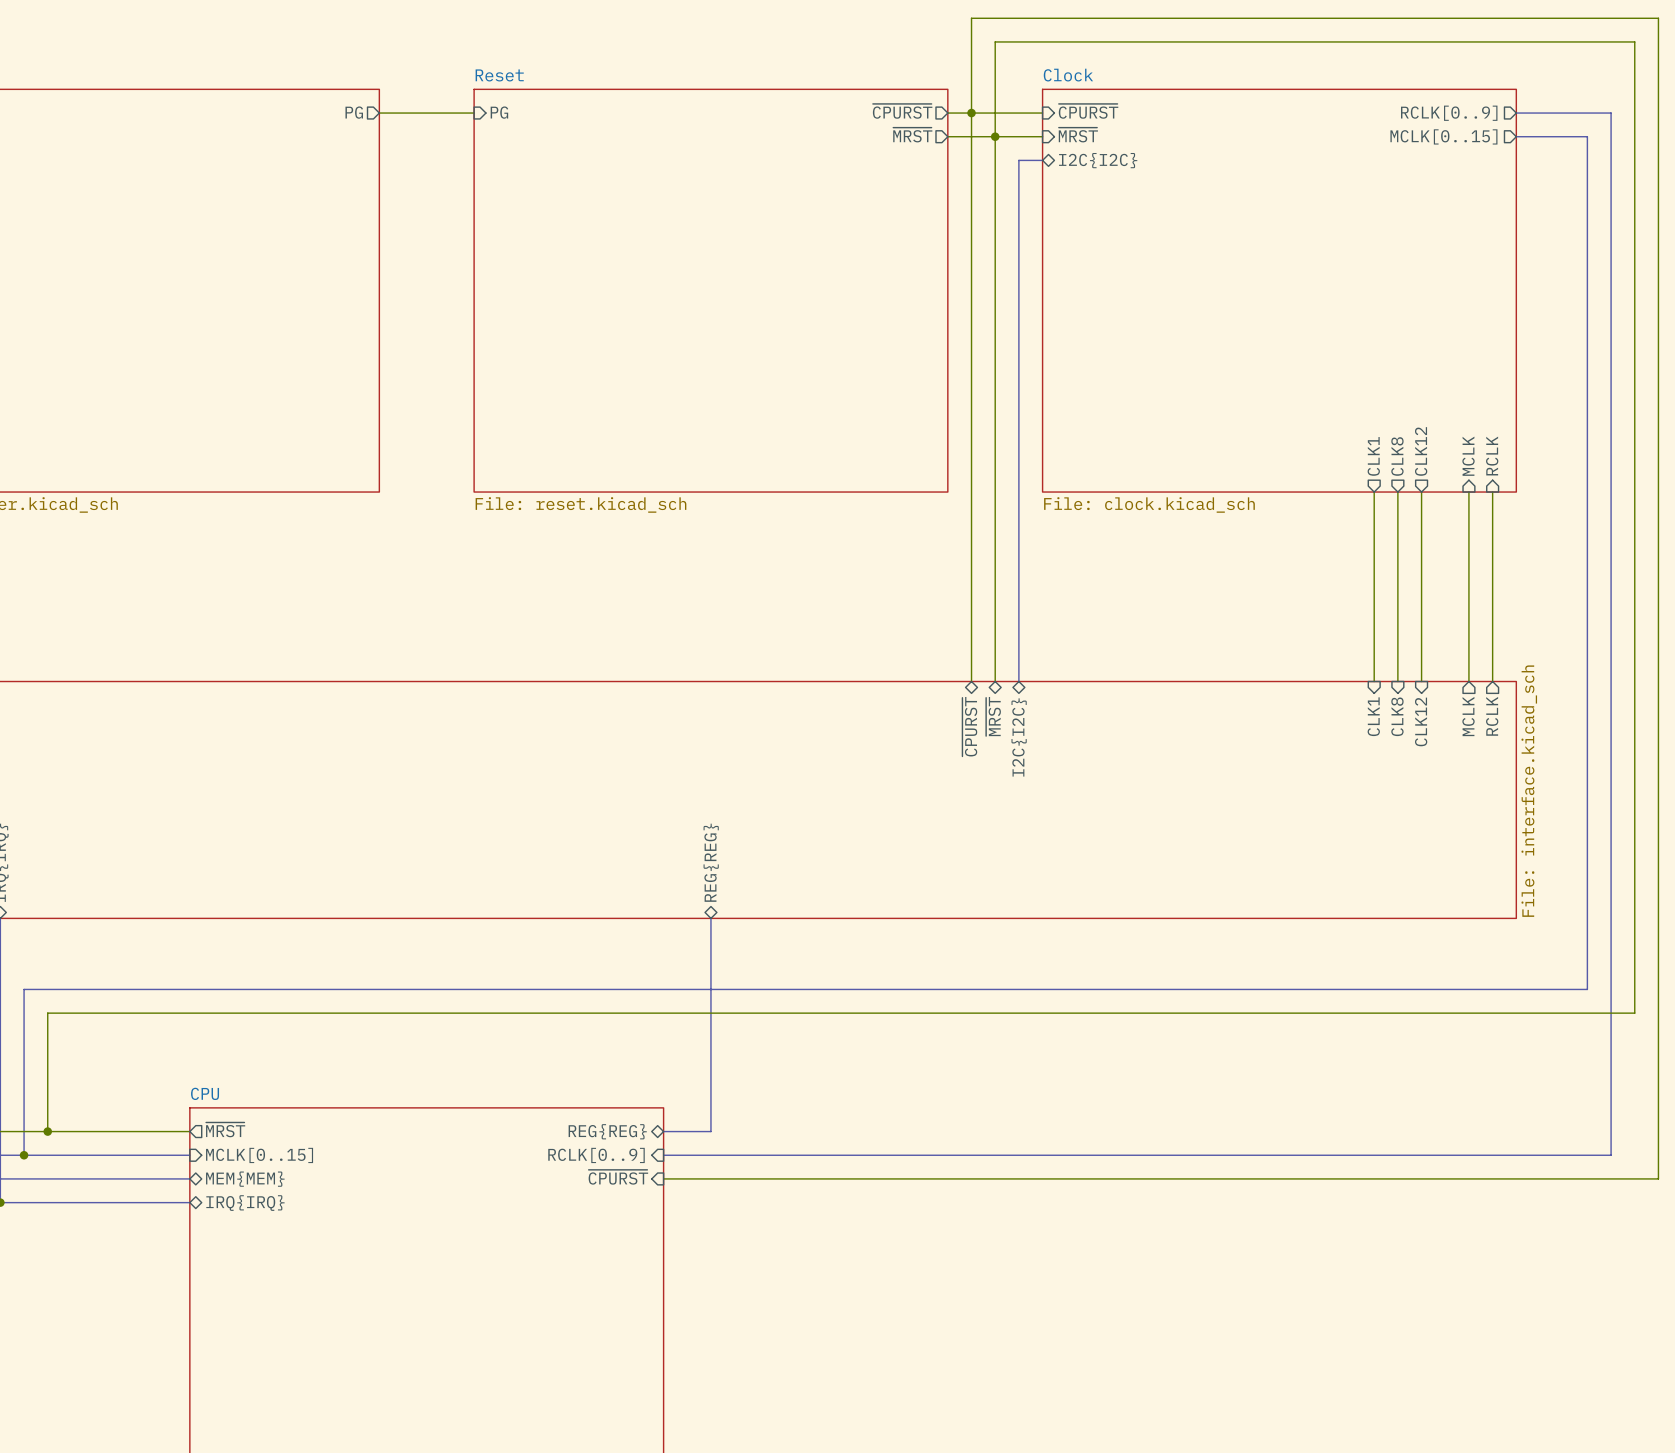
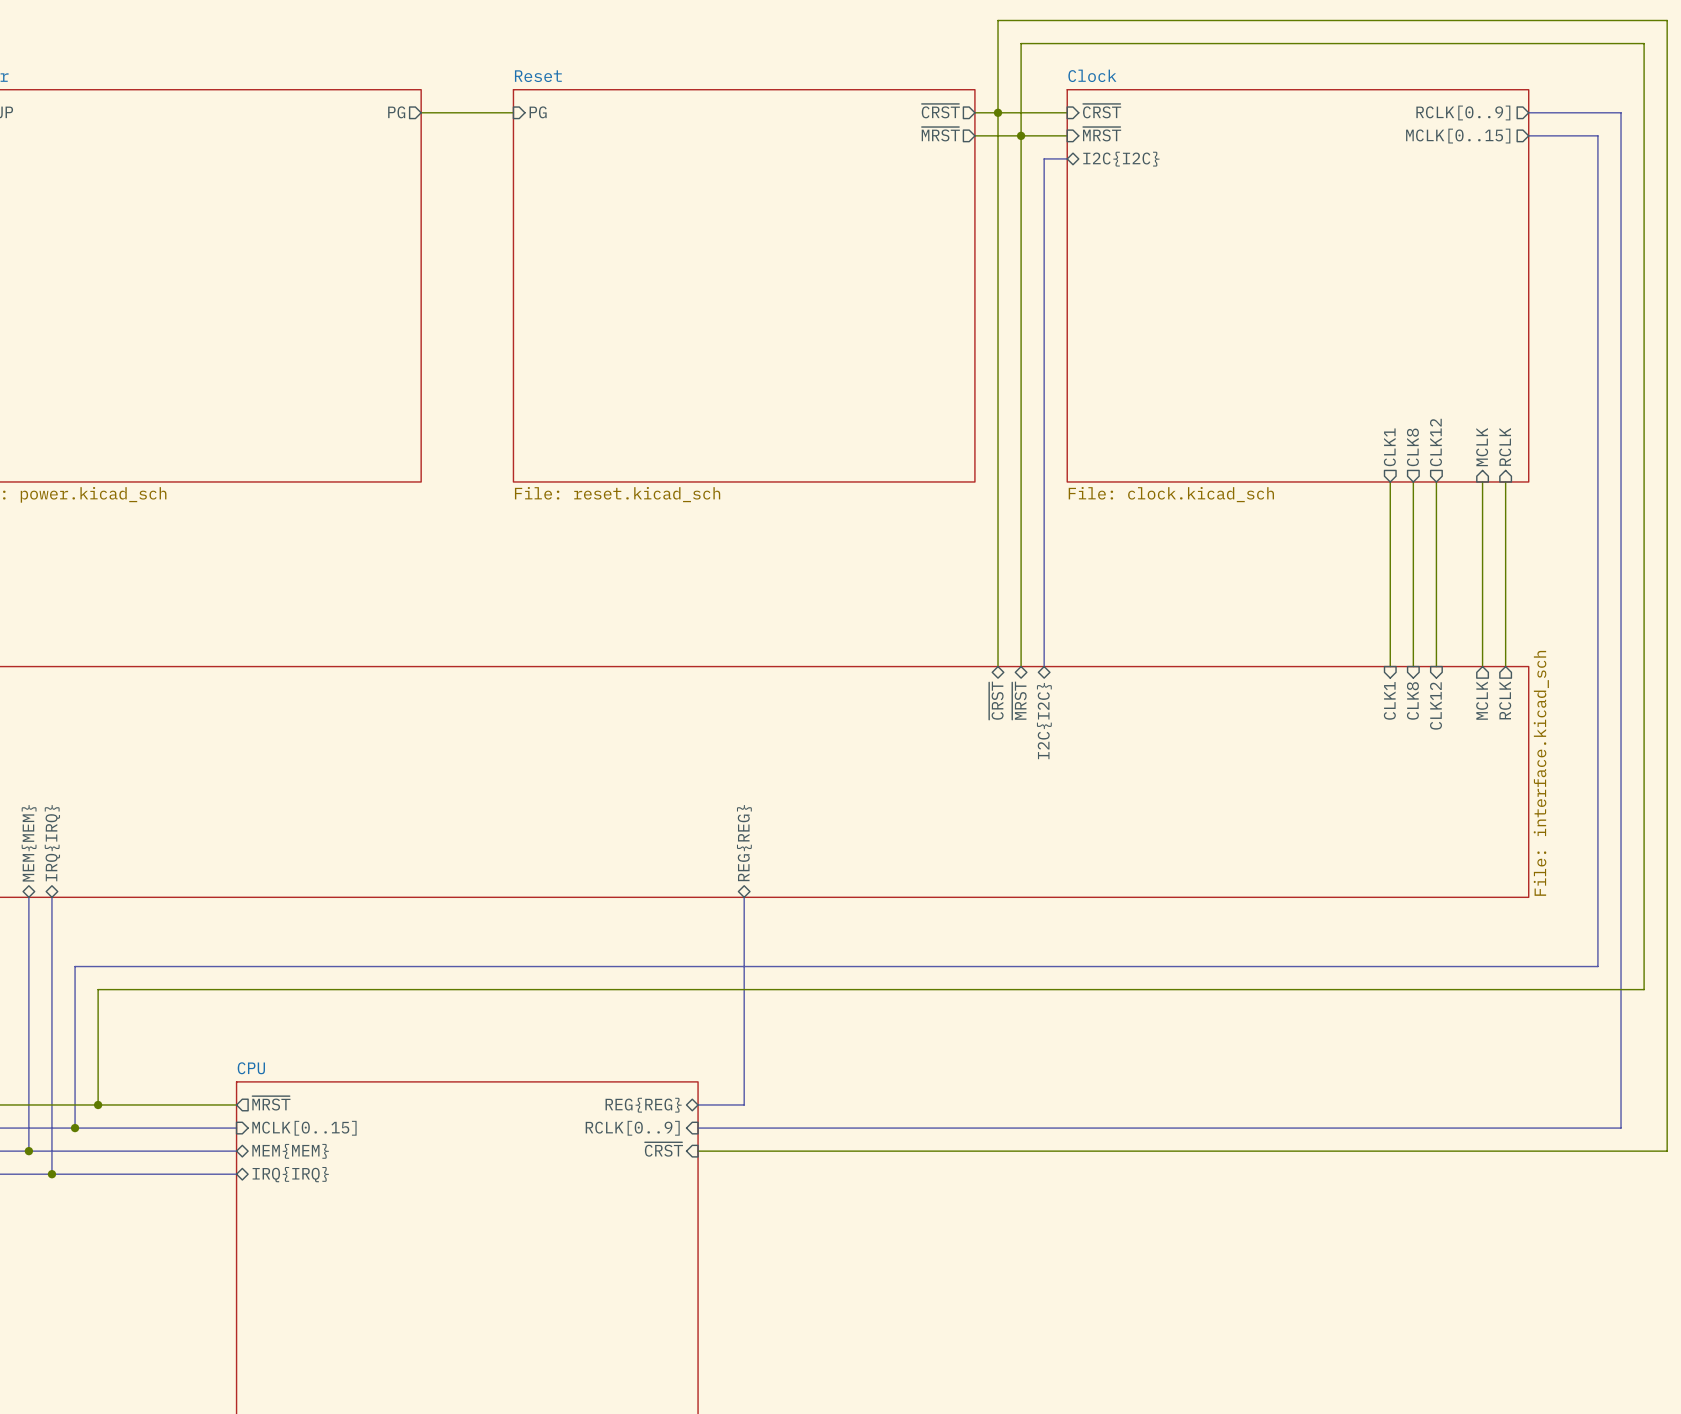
sheet pin: ~{CPURST} (902, 111) -> ~{CRST} (940, 111)
sheet pin: ~{CPURST} (1088, 111) -> ~{CRST} (1102, 111)
sheet pin: ~{CPURST} (969, 726) -> ~{CRST} (996, 700)
sheet pin: ~{CPURST} (618, 1177) -> ~{CRST} (663, 1149)

